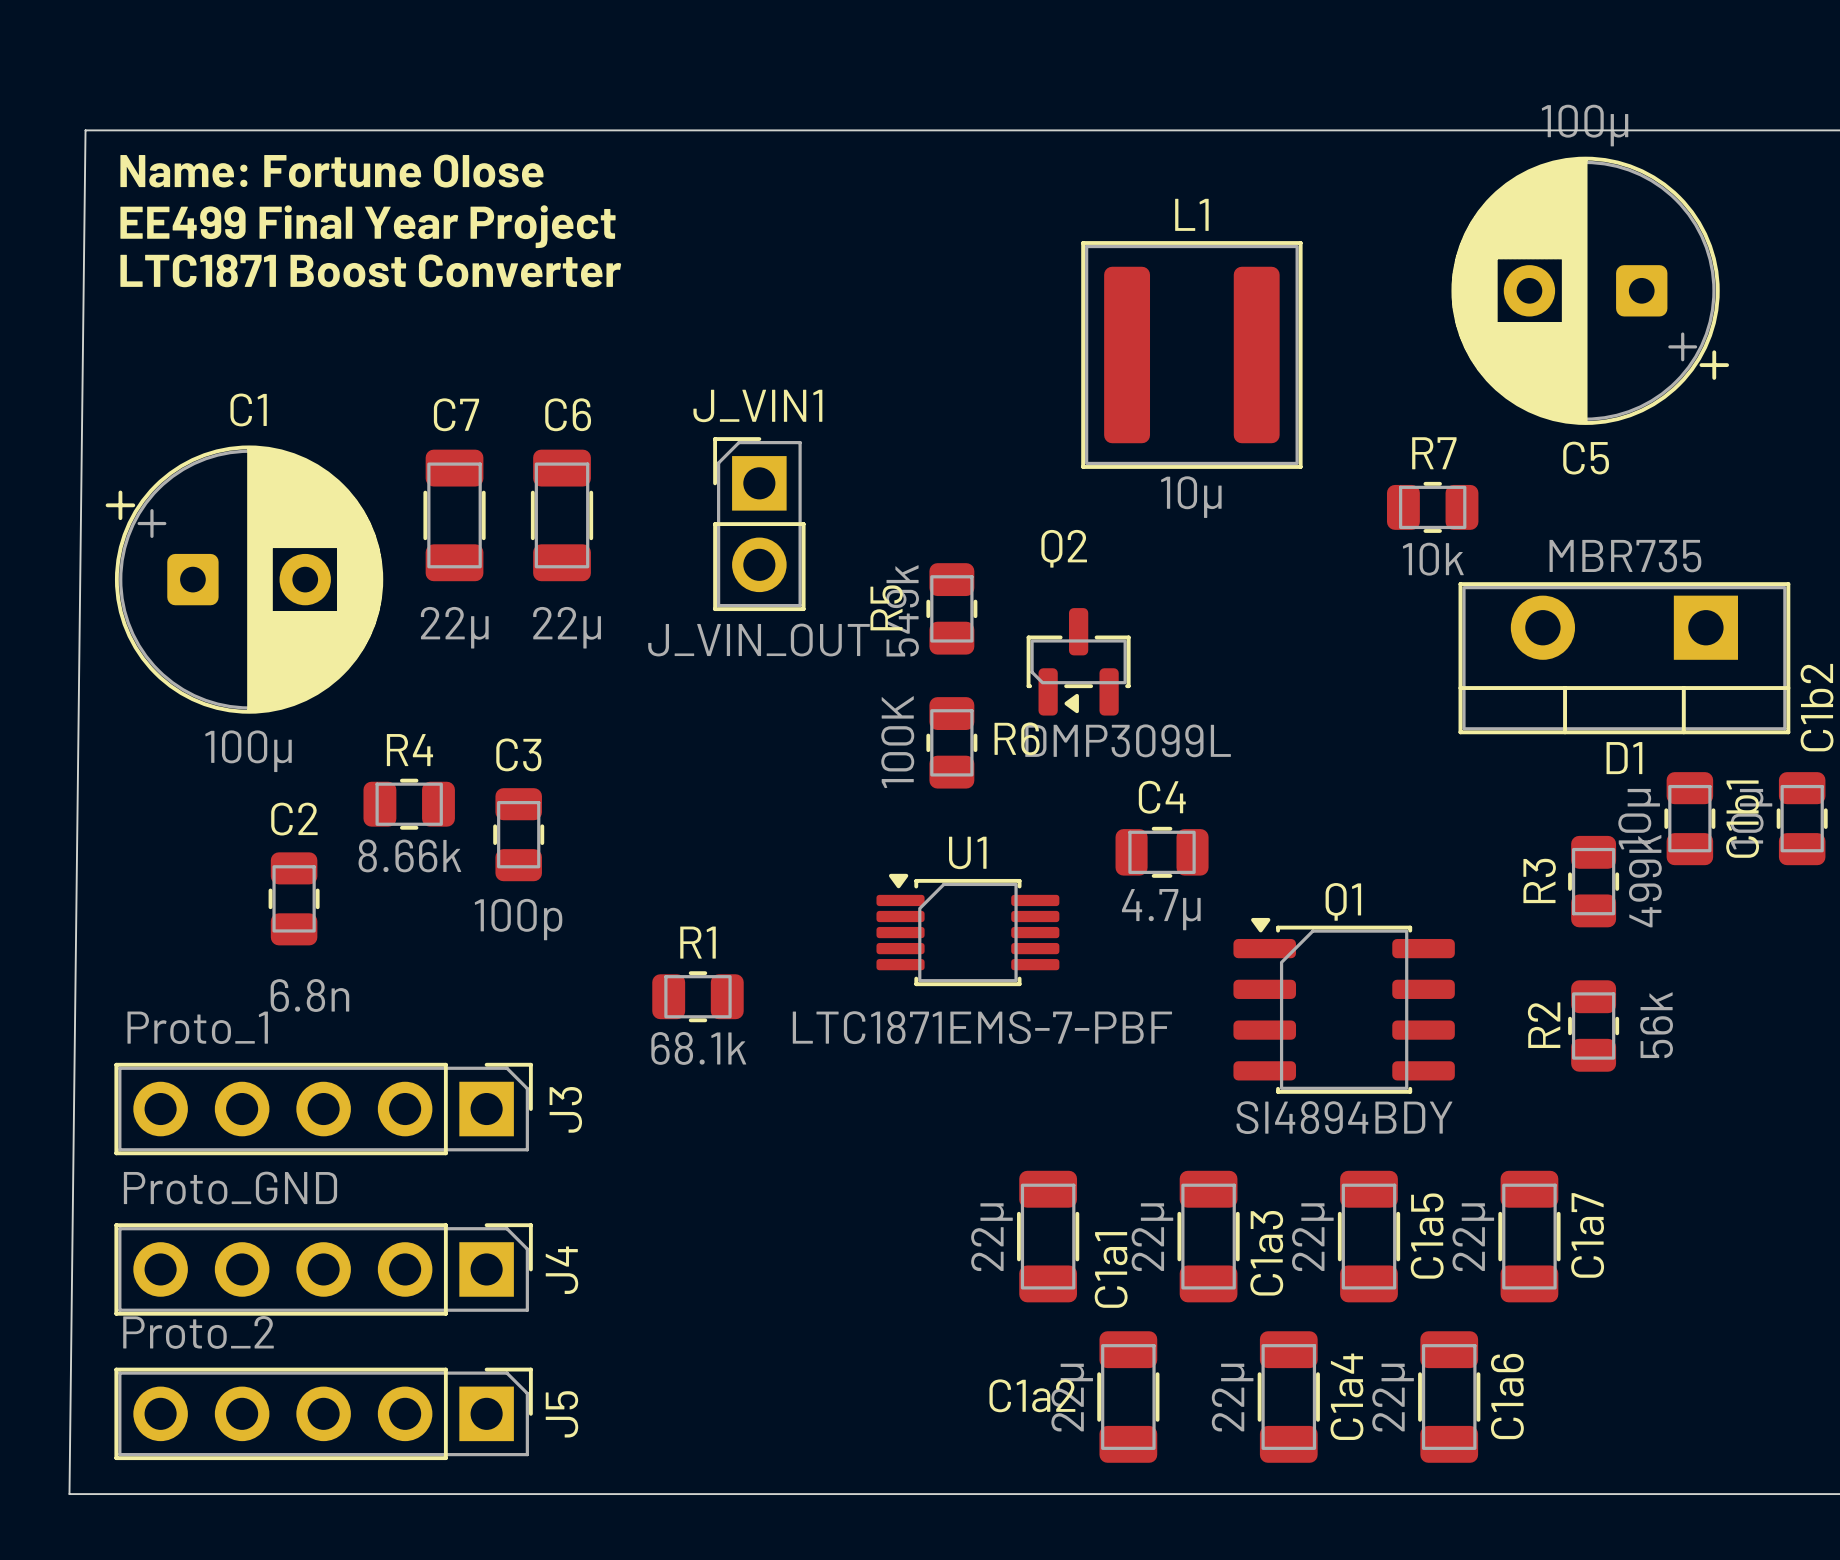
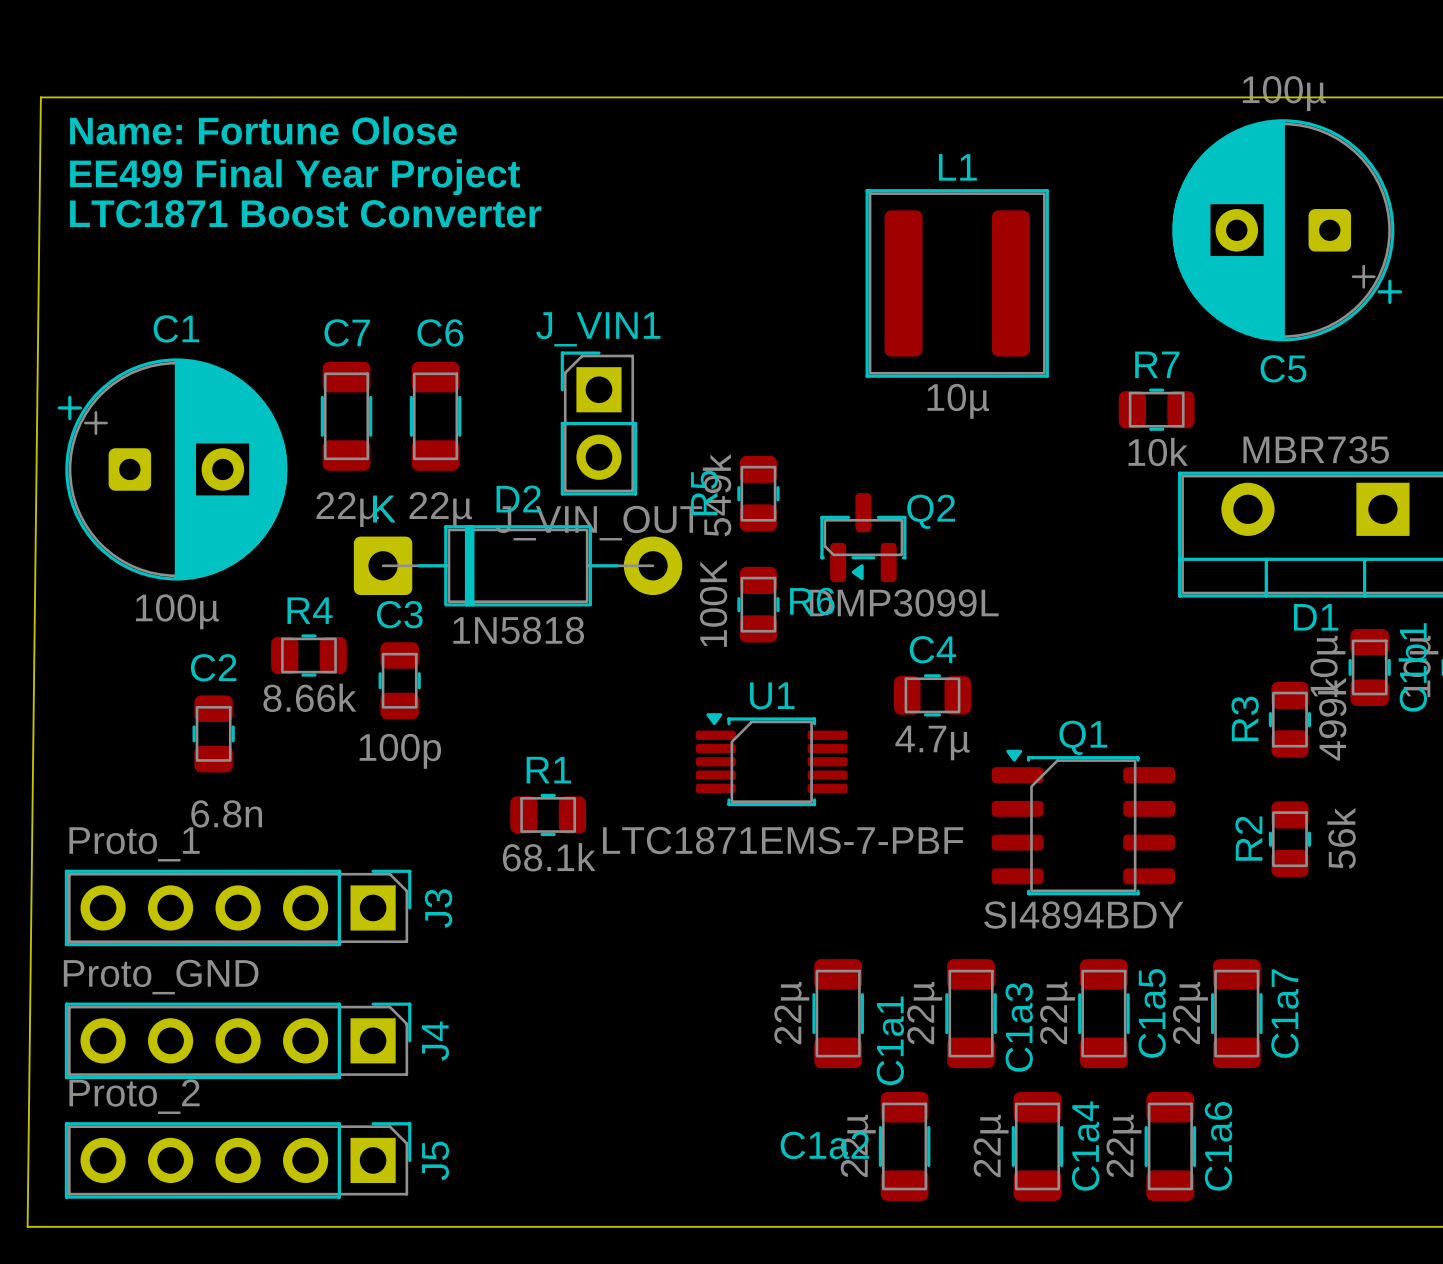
Q2 name position: Q2 (1064, 548) -> Q2 (931, 511)
D2: none -> 1N5818 (518, 565)

